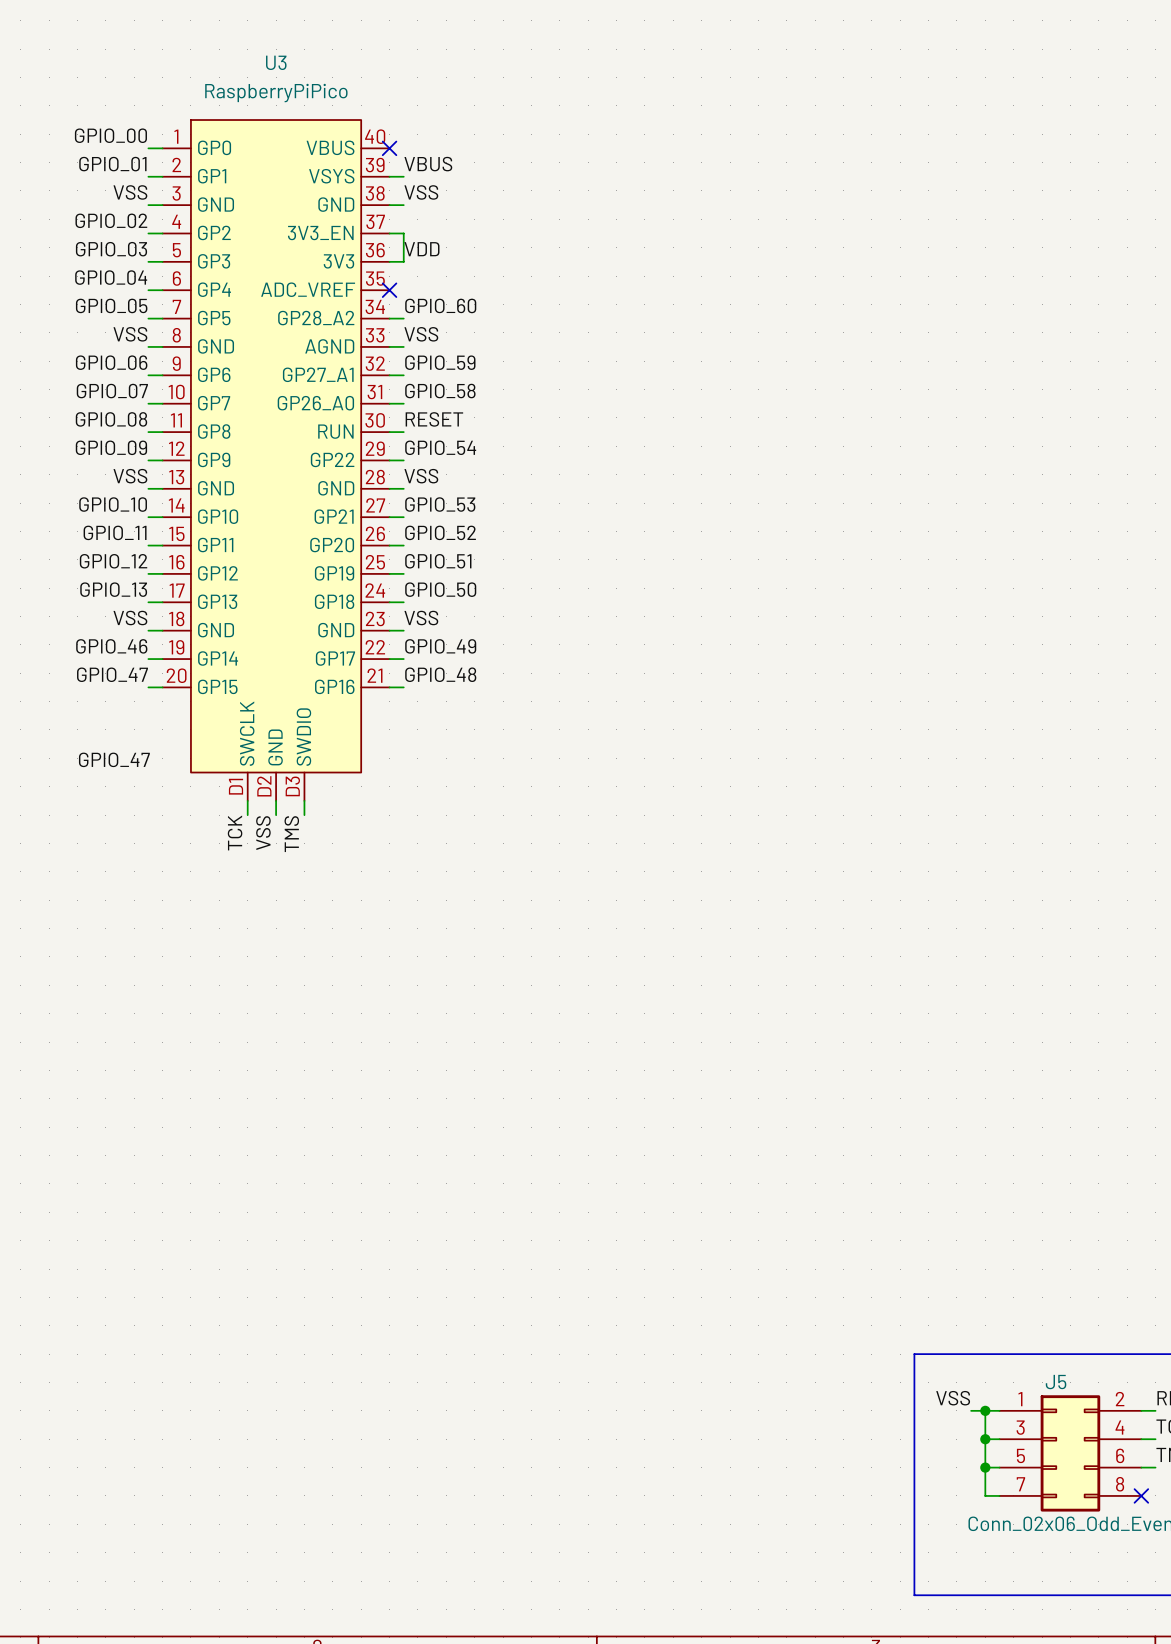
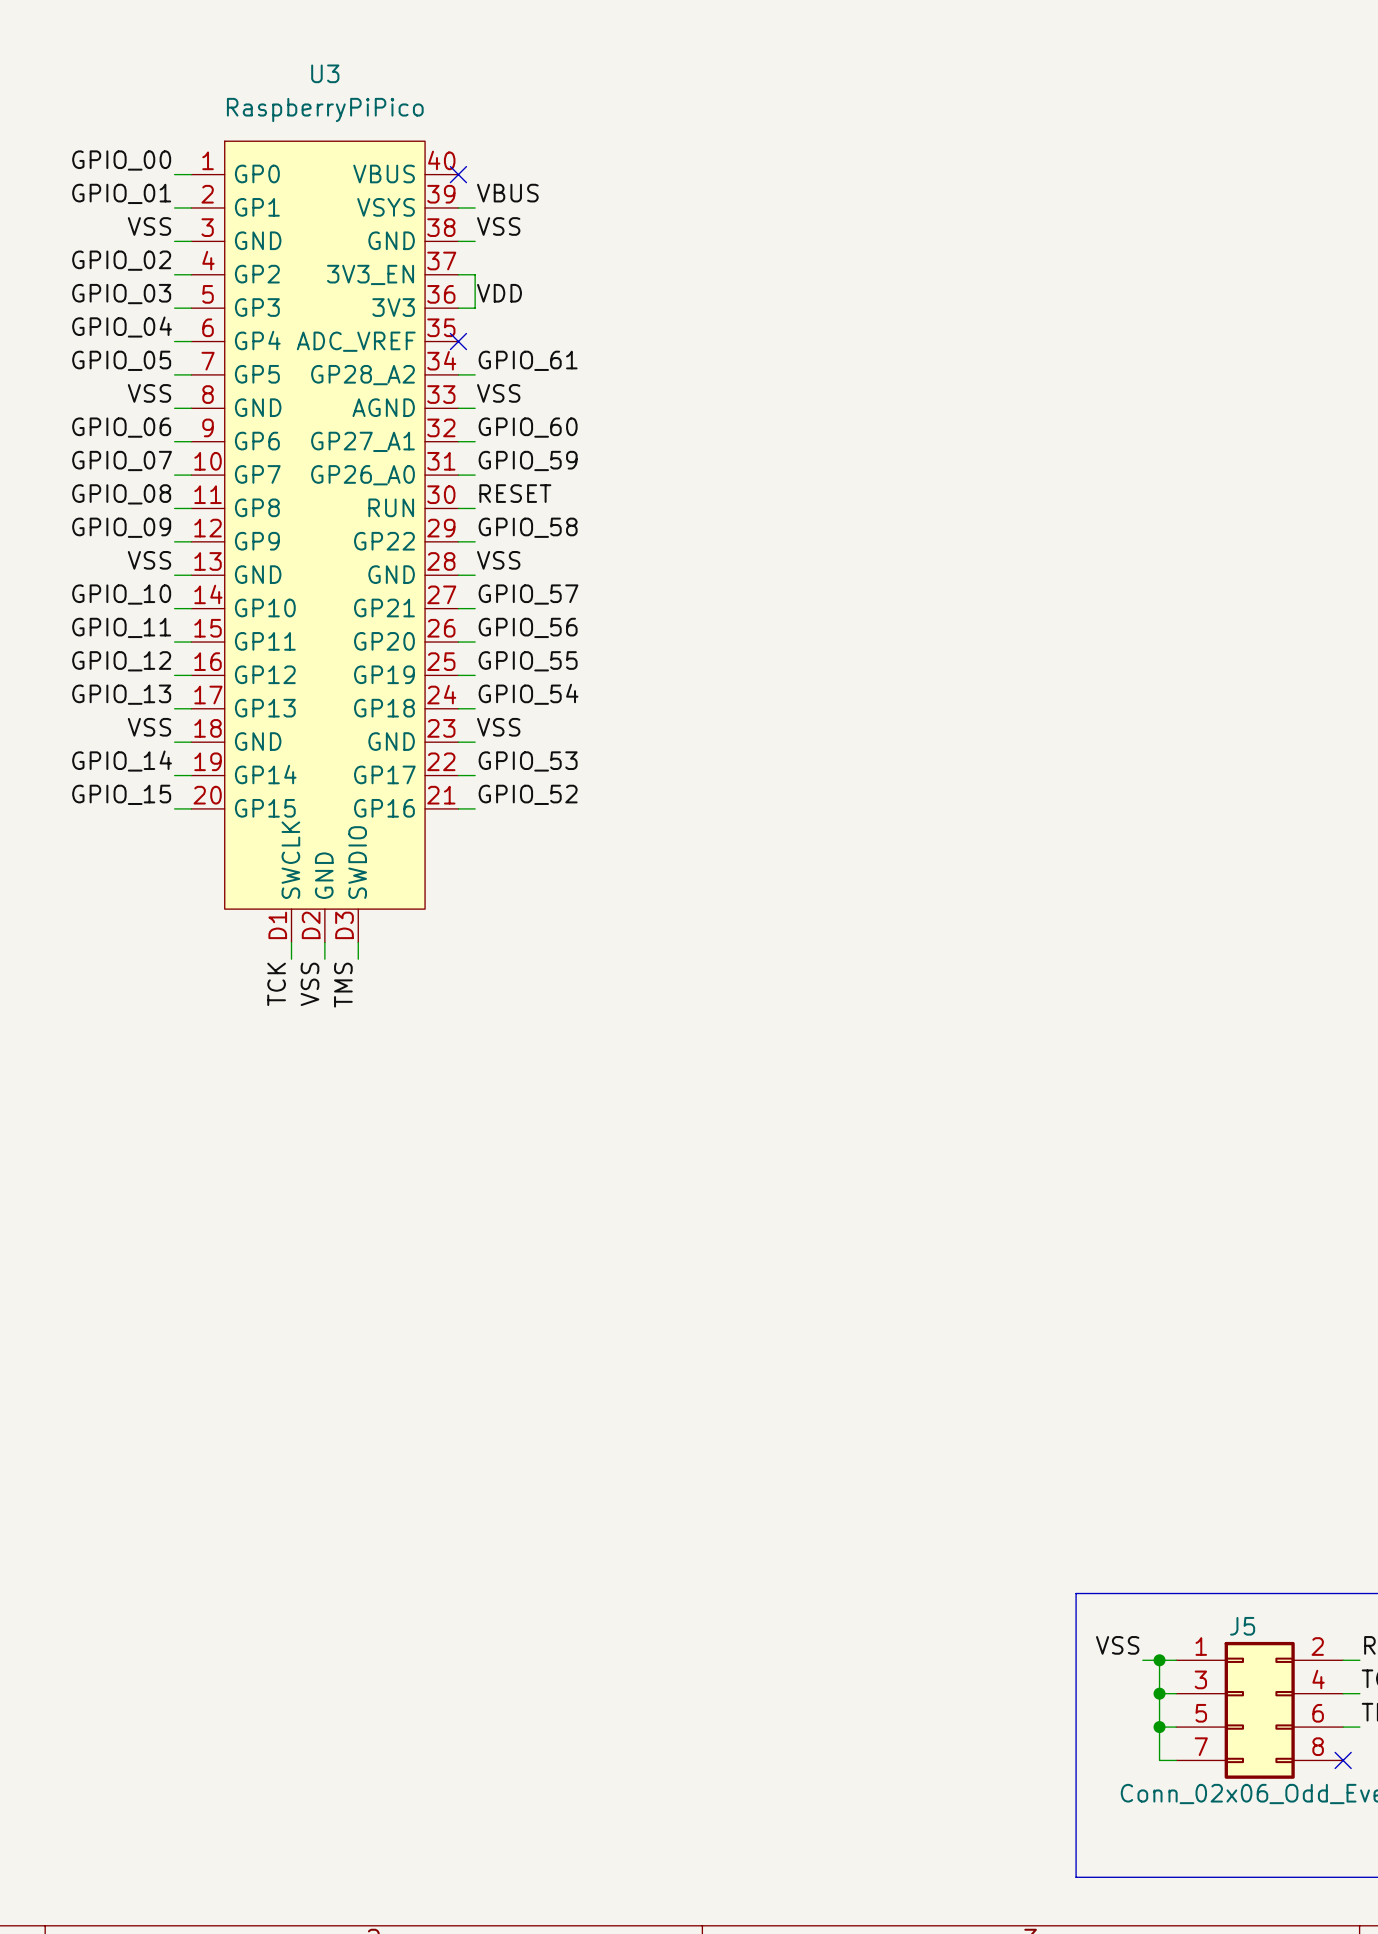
label: GPIO_60 (440, 305) -> GPIO_61 (528, 360)
label: GPIO_59 (440, 362) -> GPIO_60 (528, 427)
label: GPIO_58 (440, 391) -> GPIO_59 (528, 460)
label: GPIO_54 (440, 447) -> GPIO_58 (528, 527)
label: GPIO_53 (440, 504) -> GPIO_57 (528, 594)
label: GPIO_52 (440, 532) -> GPIO_56 (528, 627)
label: GPIO_51 (438, 561) -> GPIO_55 (528, 661)
label: GPIO_50 (440, 589) -> GPIO_54 (528, 694)
label: GPIO_46 (111, 646) -> GPIO_14 (122, 761)
label: GPIO_49 (440, 646) -> GPIO_53 (528, 761)
label: GPIO_47 (112, 674) -> GPIO_15 (121, 794)
label: GPIO_48 (440, 674) -> GPIO_52 (528, 794)
label: GPIO_47 (114, 759) -> none

